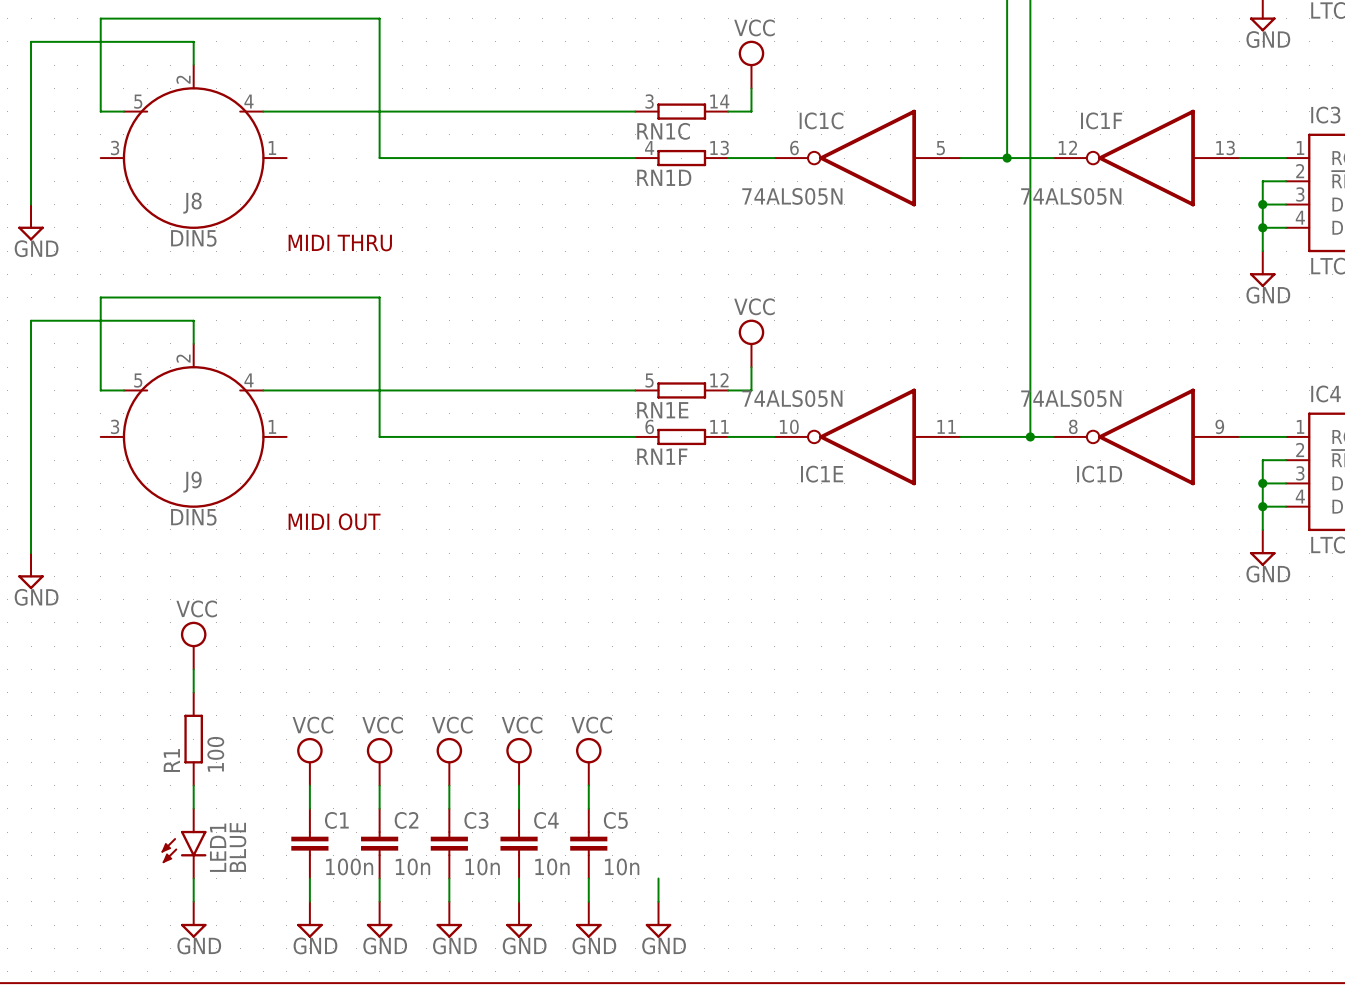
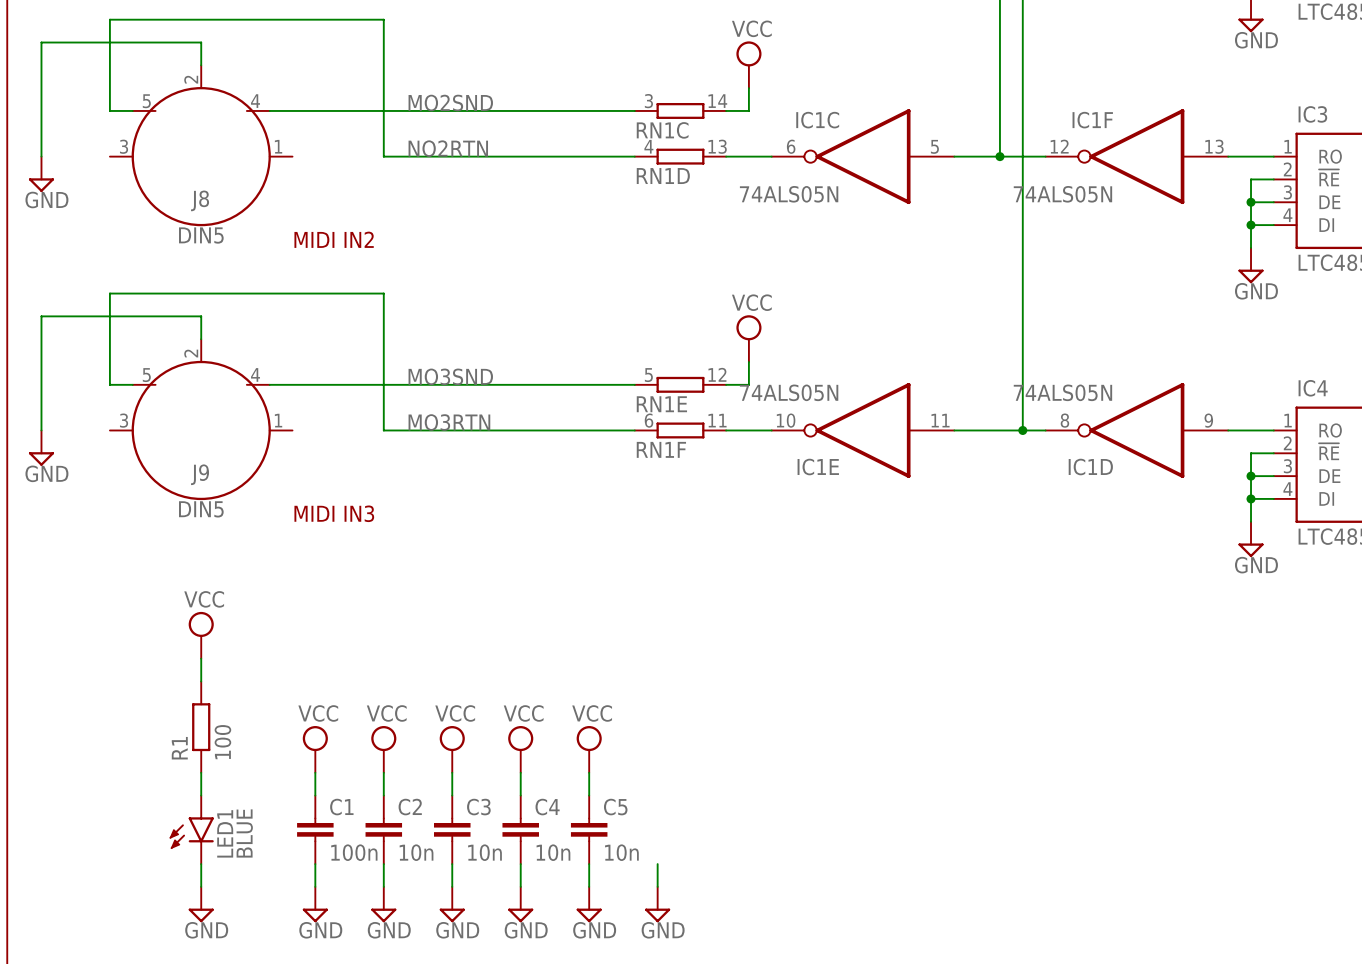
label: none -> MO2SND (450, 103)
label: none -> NO2RTN (448, 148)
power symbol position: GND (31, 222) -> GND (41, 174)
text: MIDI THRU (340, 243) -> MIDI IN2 (334, 239)
label: none -> MO3SND (450, 376)
label: none -> MO3RTN (449, 422)
wire: (31, 436) (31, 553) -> none
power symbol: none -> GND (41, 448)
text: MIDI OUT (334, 521) -> MIDI IN3 (334, 513)
power symbol: GND (31, 571) -> none

